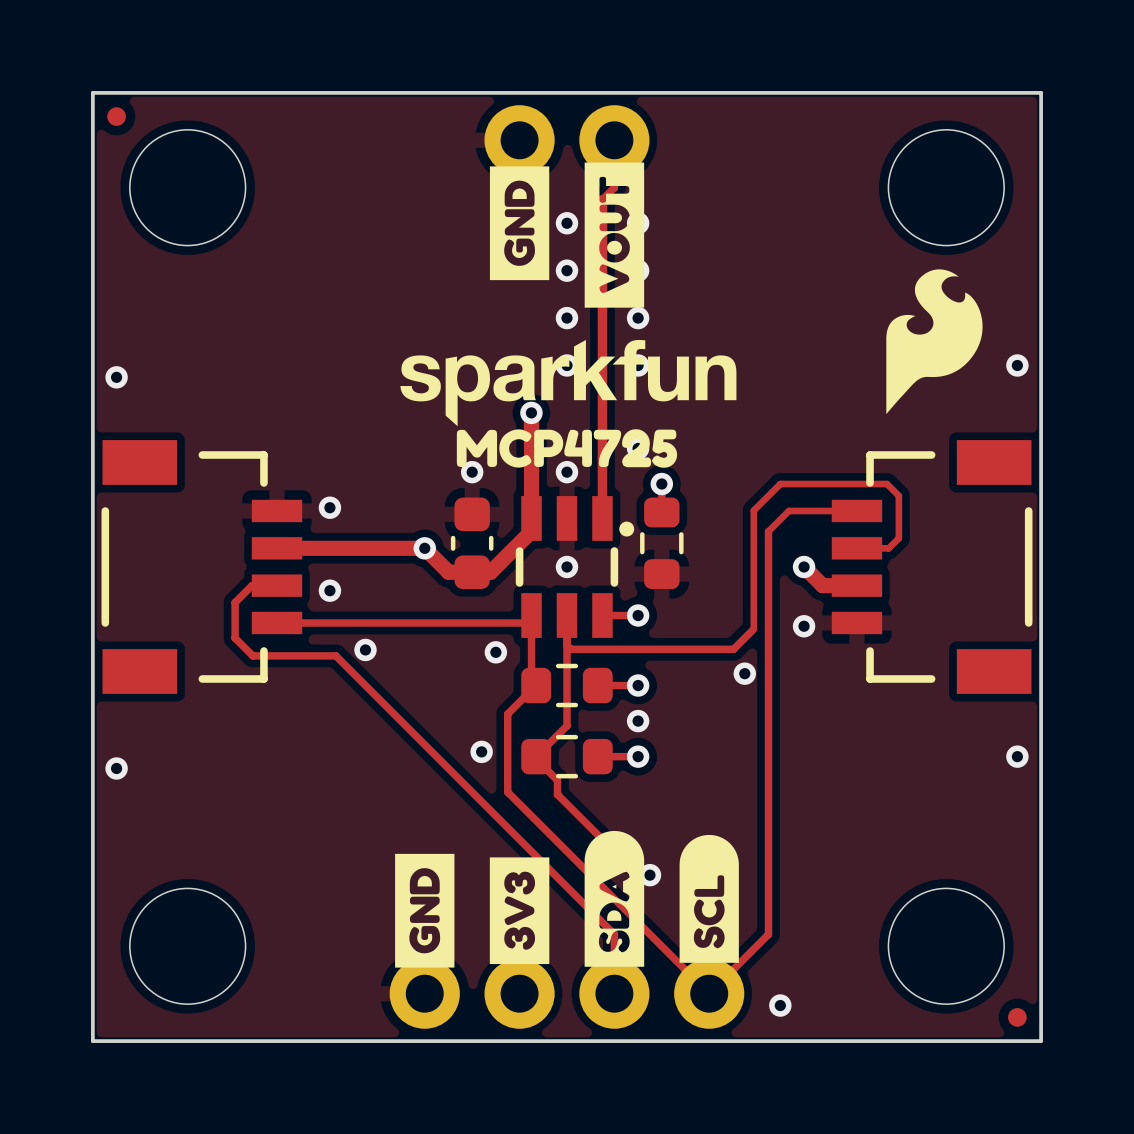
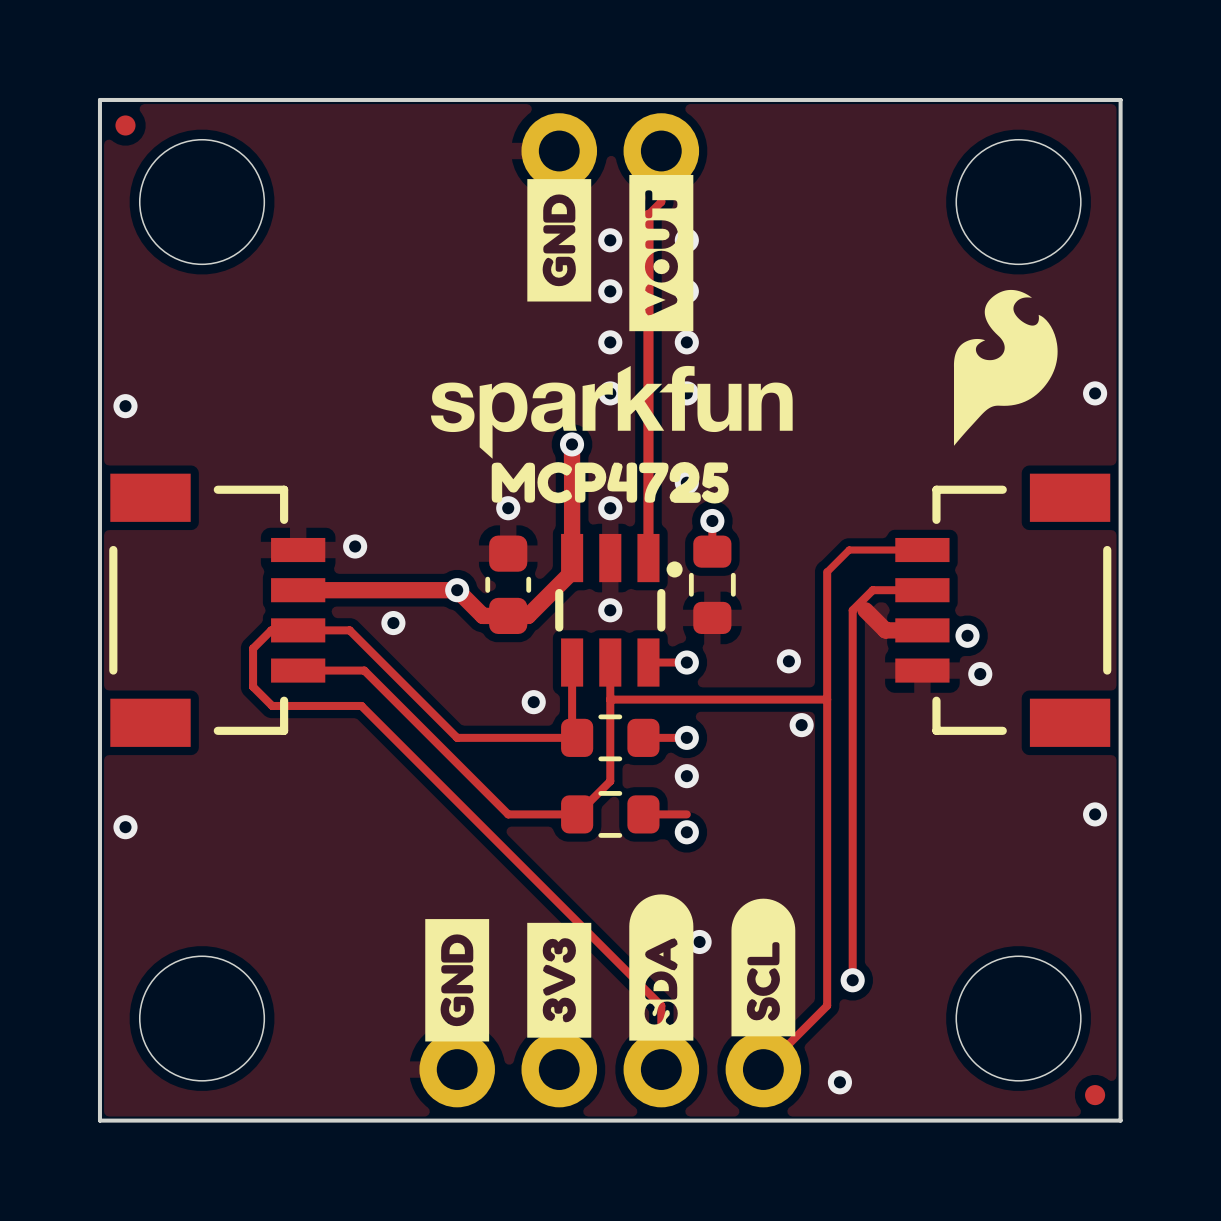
track: (856, 548) (888, 548) (898, 538) (898, 495) (887, 484) (780, 484) (753, 510) (753, 629) -> (922, 590) (872, 590) (852, 610) (852, 980)
via: (804, 566) -> none
via: none -> (393, 623)
via: (329, 590) -> none
via: none -> (967, 635)
via: none -> (788, 661)
track: (531, 615) (524, 622) (338, 622) -> (577, 814) (508, 814) (364, 670)
via: (804, 626) -> none
via: none -> (980, 674)
track: (753, 629) (733, 649) (570, 649) (566, 645) -> none
via: (365, 649) -> none
track: none -> (610, 699) (827, 699)
track: (536, 685) (507, 713) (507, 792) (709, 993) -> (577, 737) (457, 737) (349, 630) (298, 630)
via: (481, 751) -> none
track: (536, 756) (536, 759) (557, 780) (557, 794) (614, 851) -> none
via position: (638, 756) -> (686, 832)
via: none -> (852, 980)

